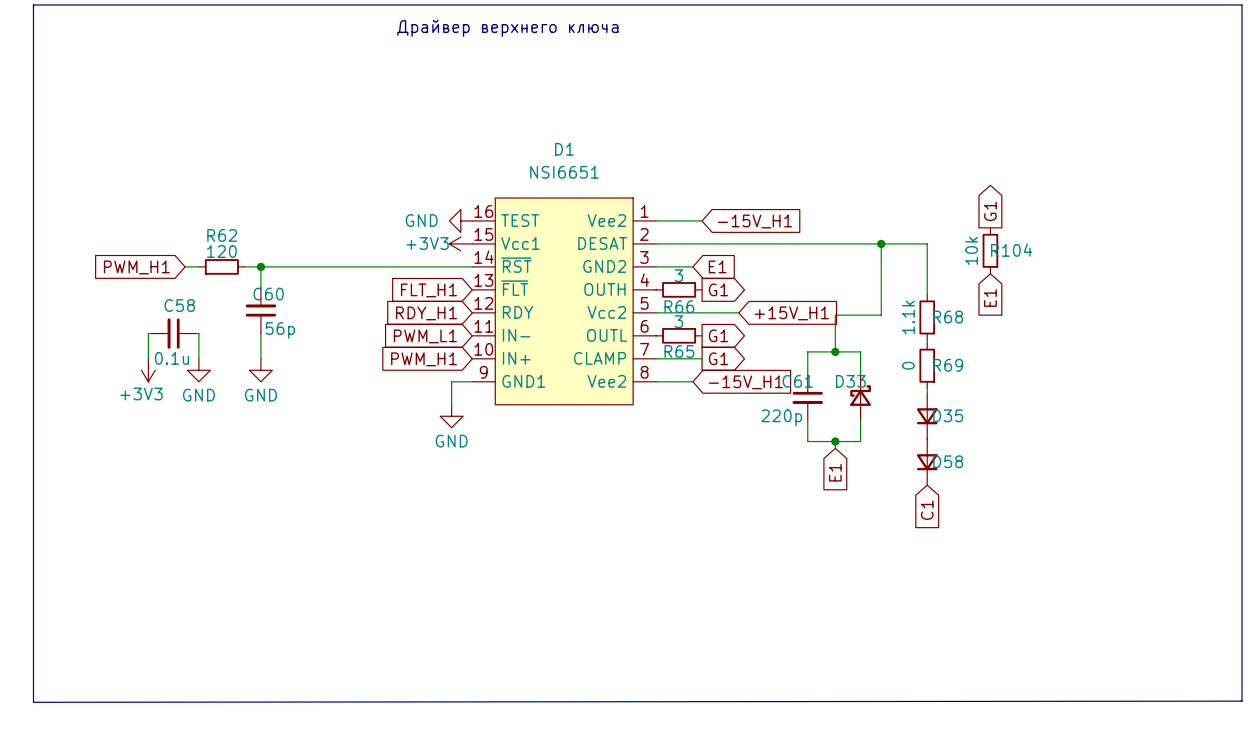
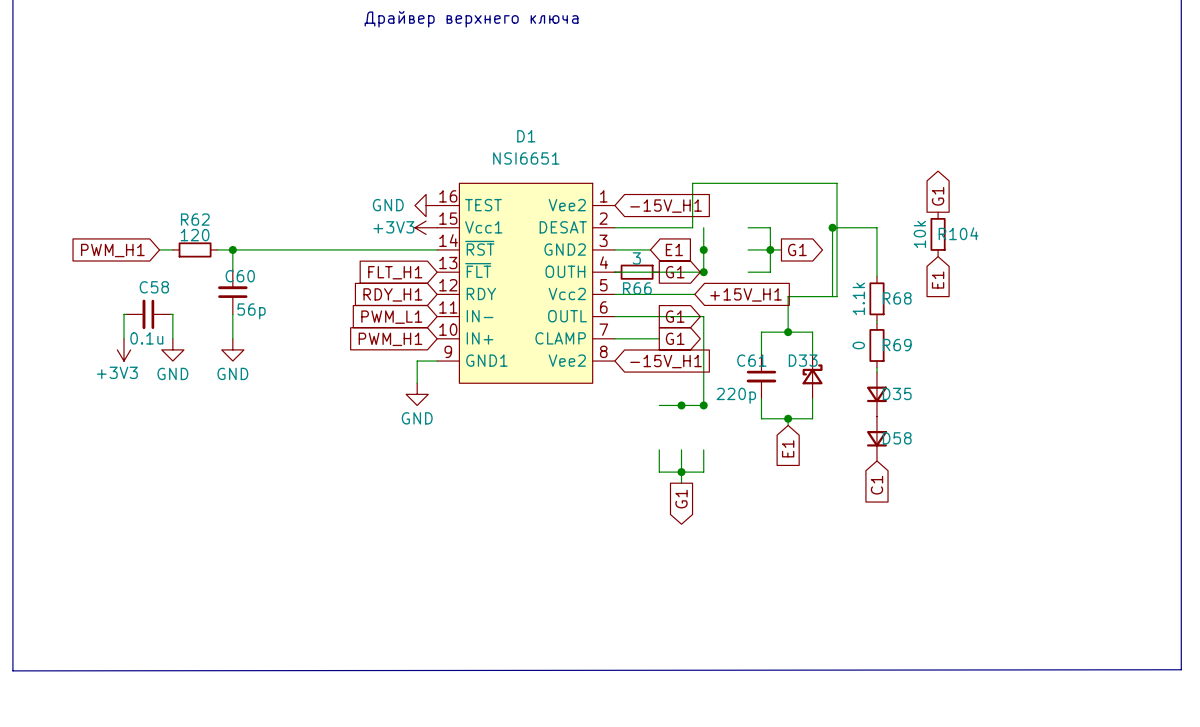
wire: (656, 220) (702, 220) -> none
global label position: -15V_H1 (755, 221) -> -15V_H1 (666, 206)
wire: (736, 243) (793, 243) -> (692, 227) (692, 183) (837, 183) (837, 296) (832, 296)
wire: none -> (703, 227) (703, 272) (614, 272)
wire: (816, 243) (885, 243) -> (770, 227) (770, 272) (748, 272)
junction: none -> (703, 249)
wire: none -> (748, 249) (781, 249)
junction: none -> (770, 249)
global label: none -> G1 (797, 249)
junction: none -> (703, 272)
wire: none -> (614, 316) (703, 316) (703, 405) (659, 405)
R65: 3 (679, 335) -> none
wire: (656, 381) (692, 381) -> none
global label position: -15V_H1 (745, 382) -> -15V_H1 (666, 361)
junction: none -> (681, 405)
junction: none -> (703, 405)
wire: none -> (659, 449) (659, 472) (703, 472) (703, 449)
wire: none -> (681, 449) (681, 483)
junction: none -> (681, 472)
global label: none -> G1 (681, 499)

